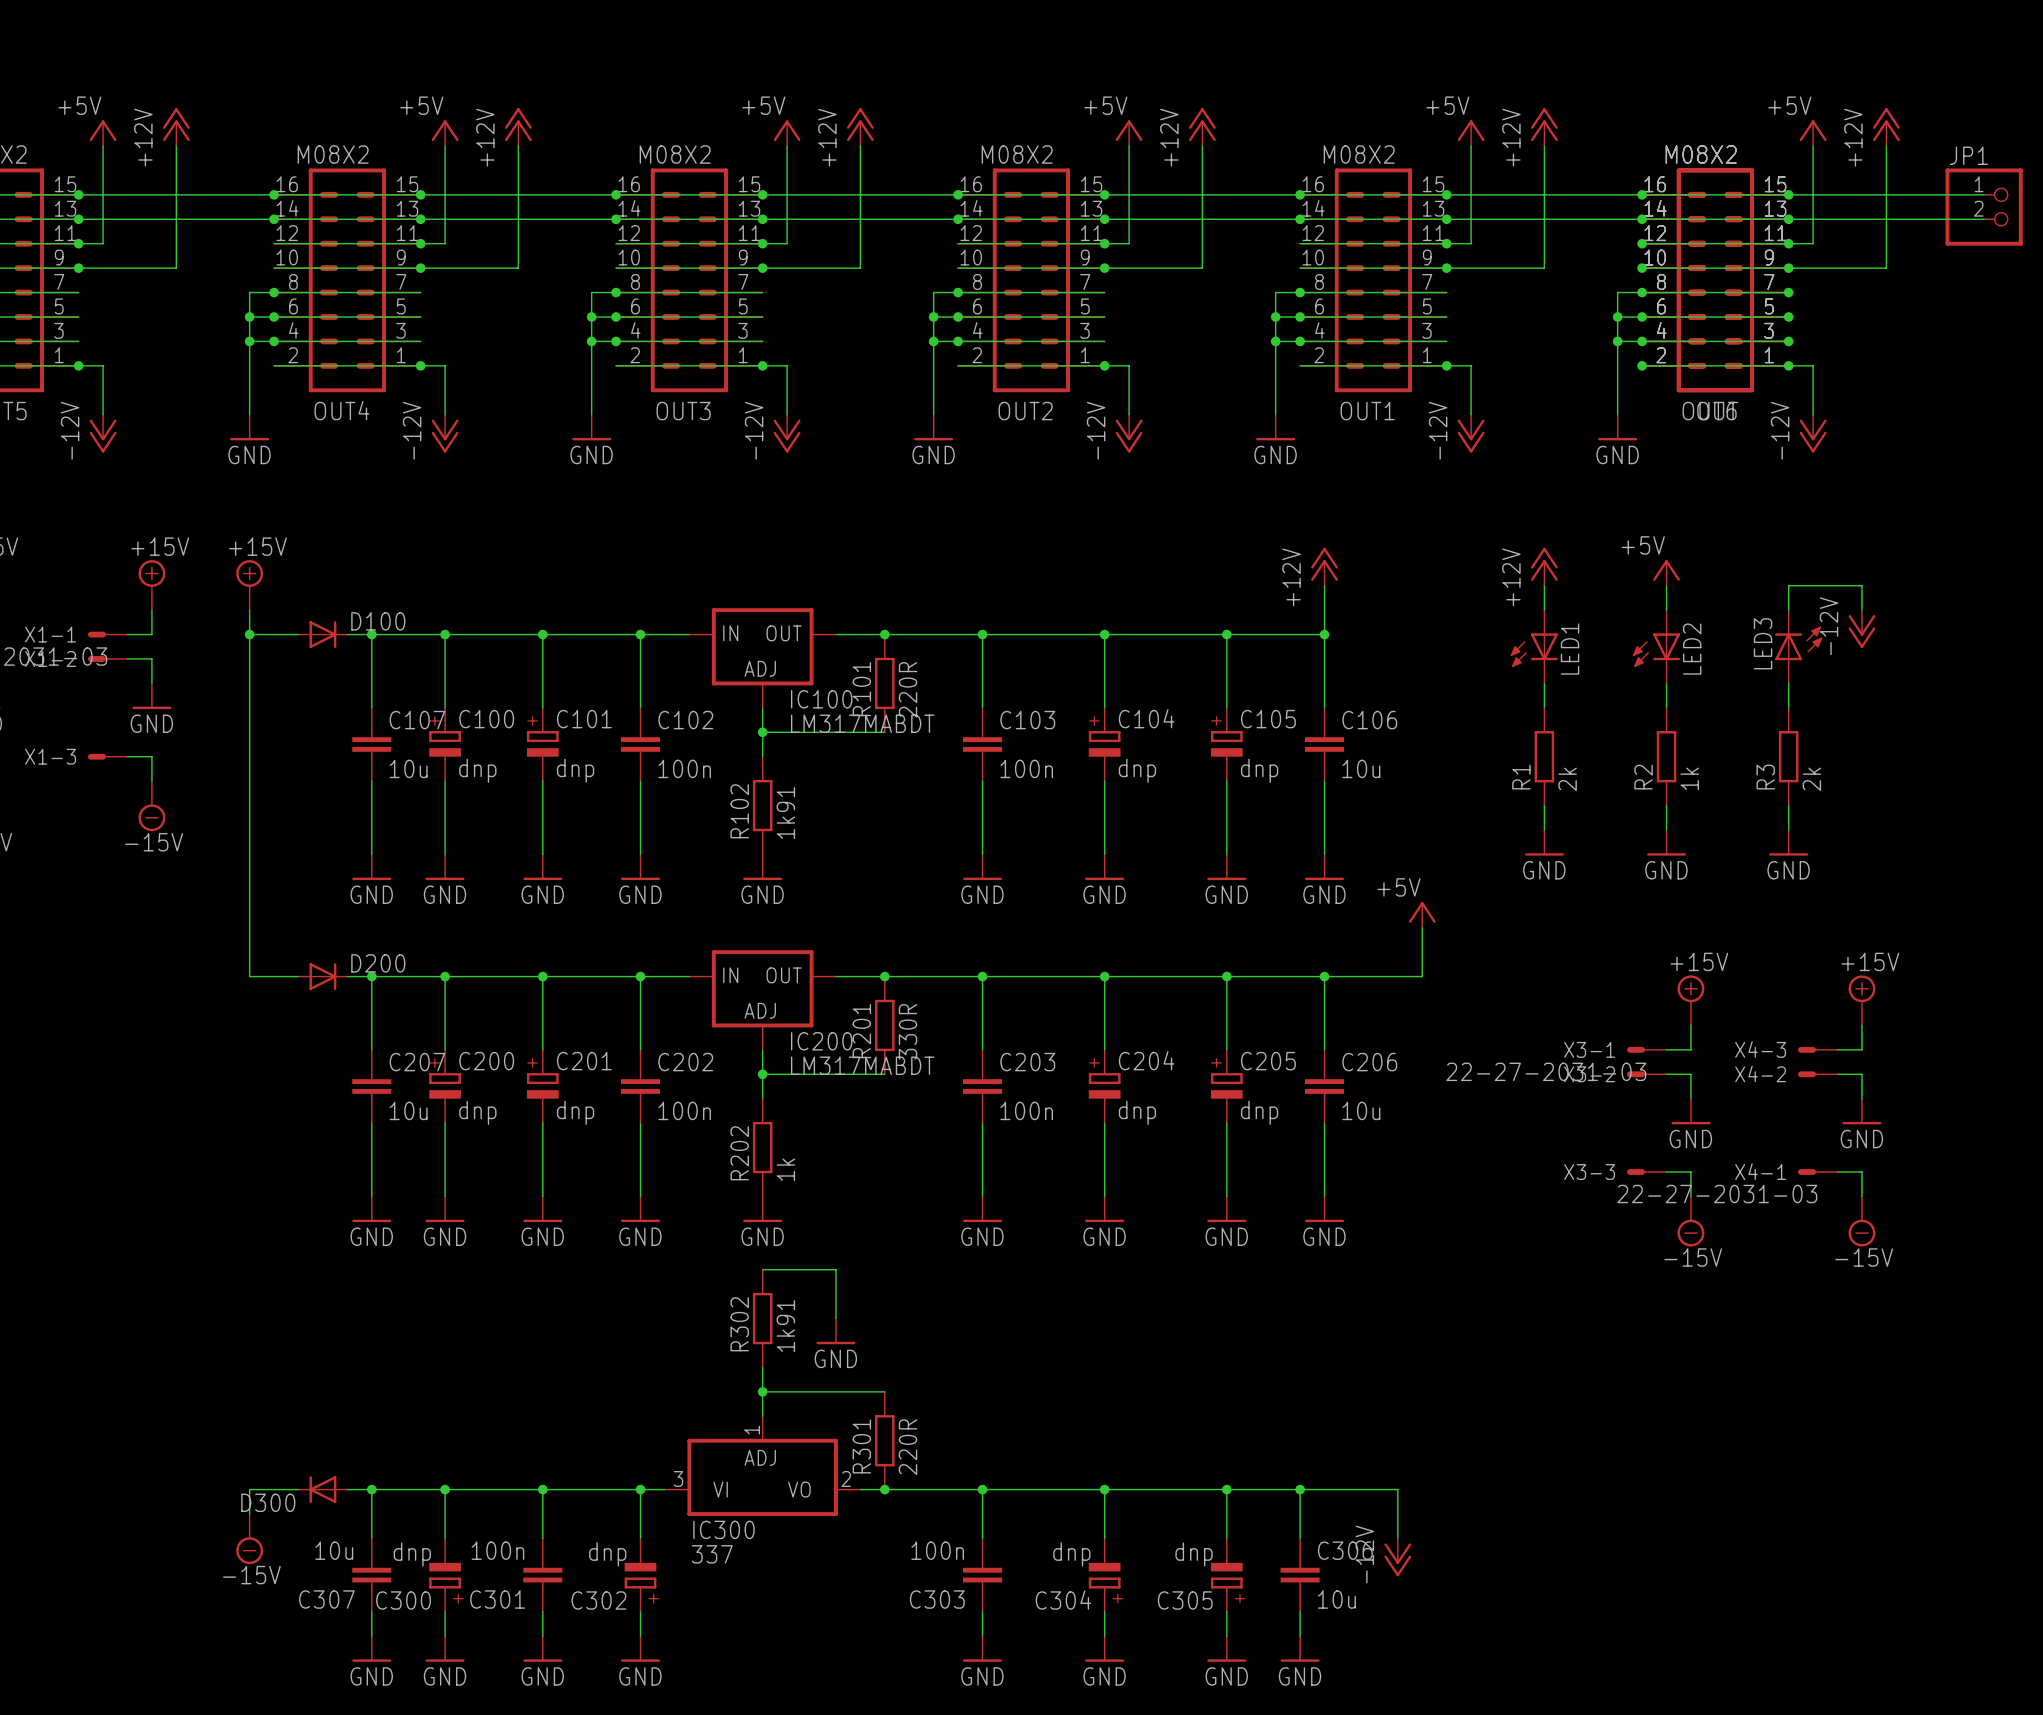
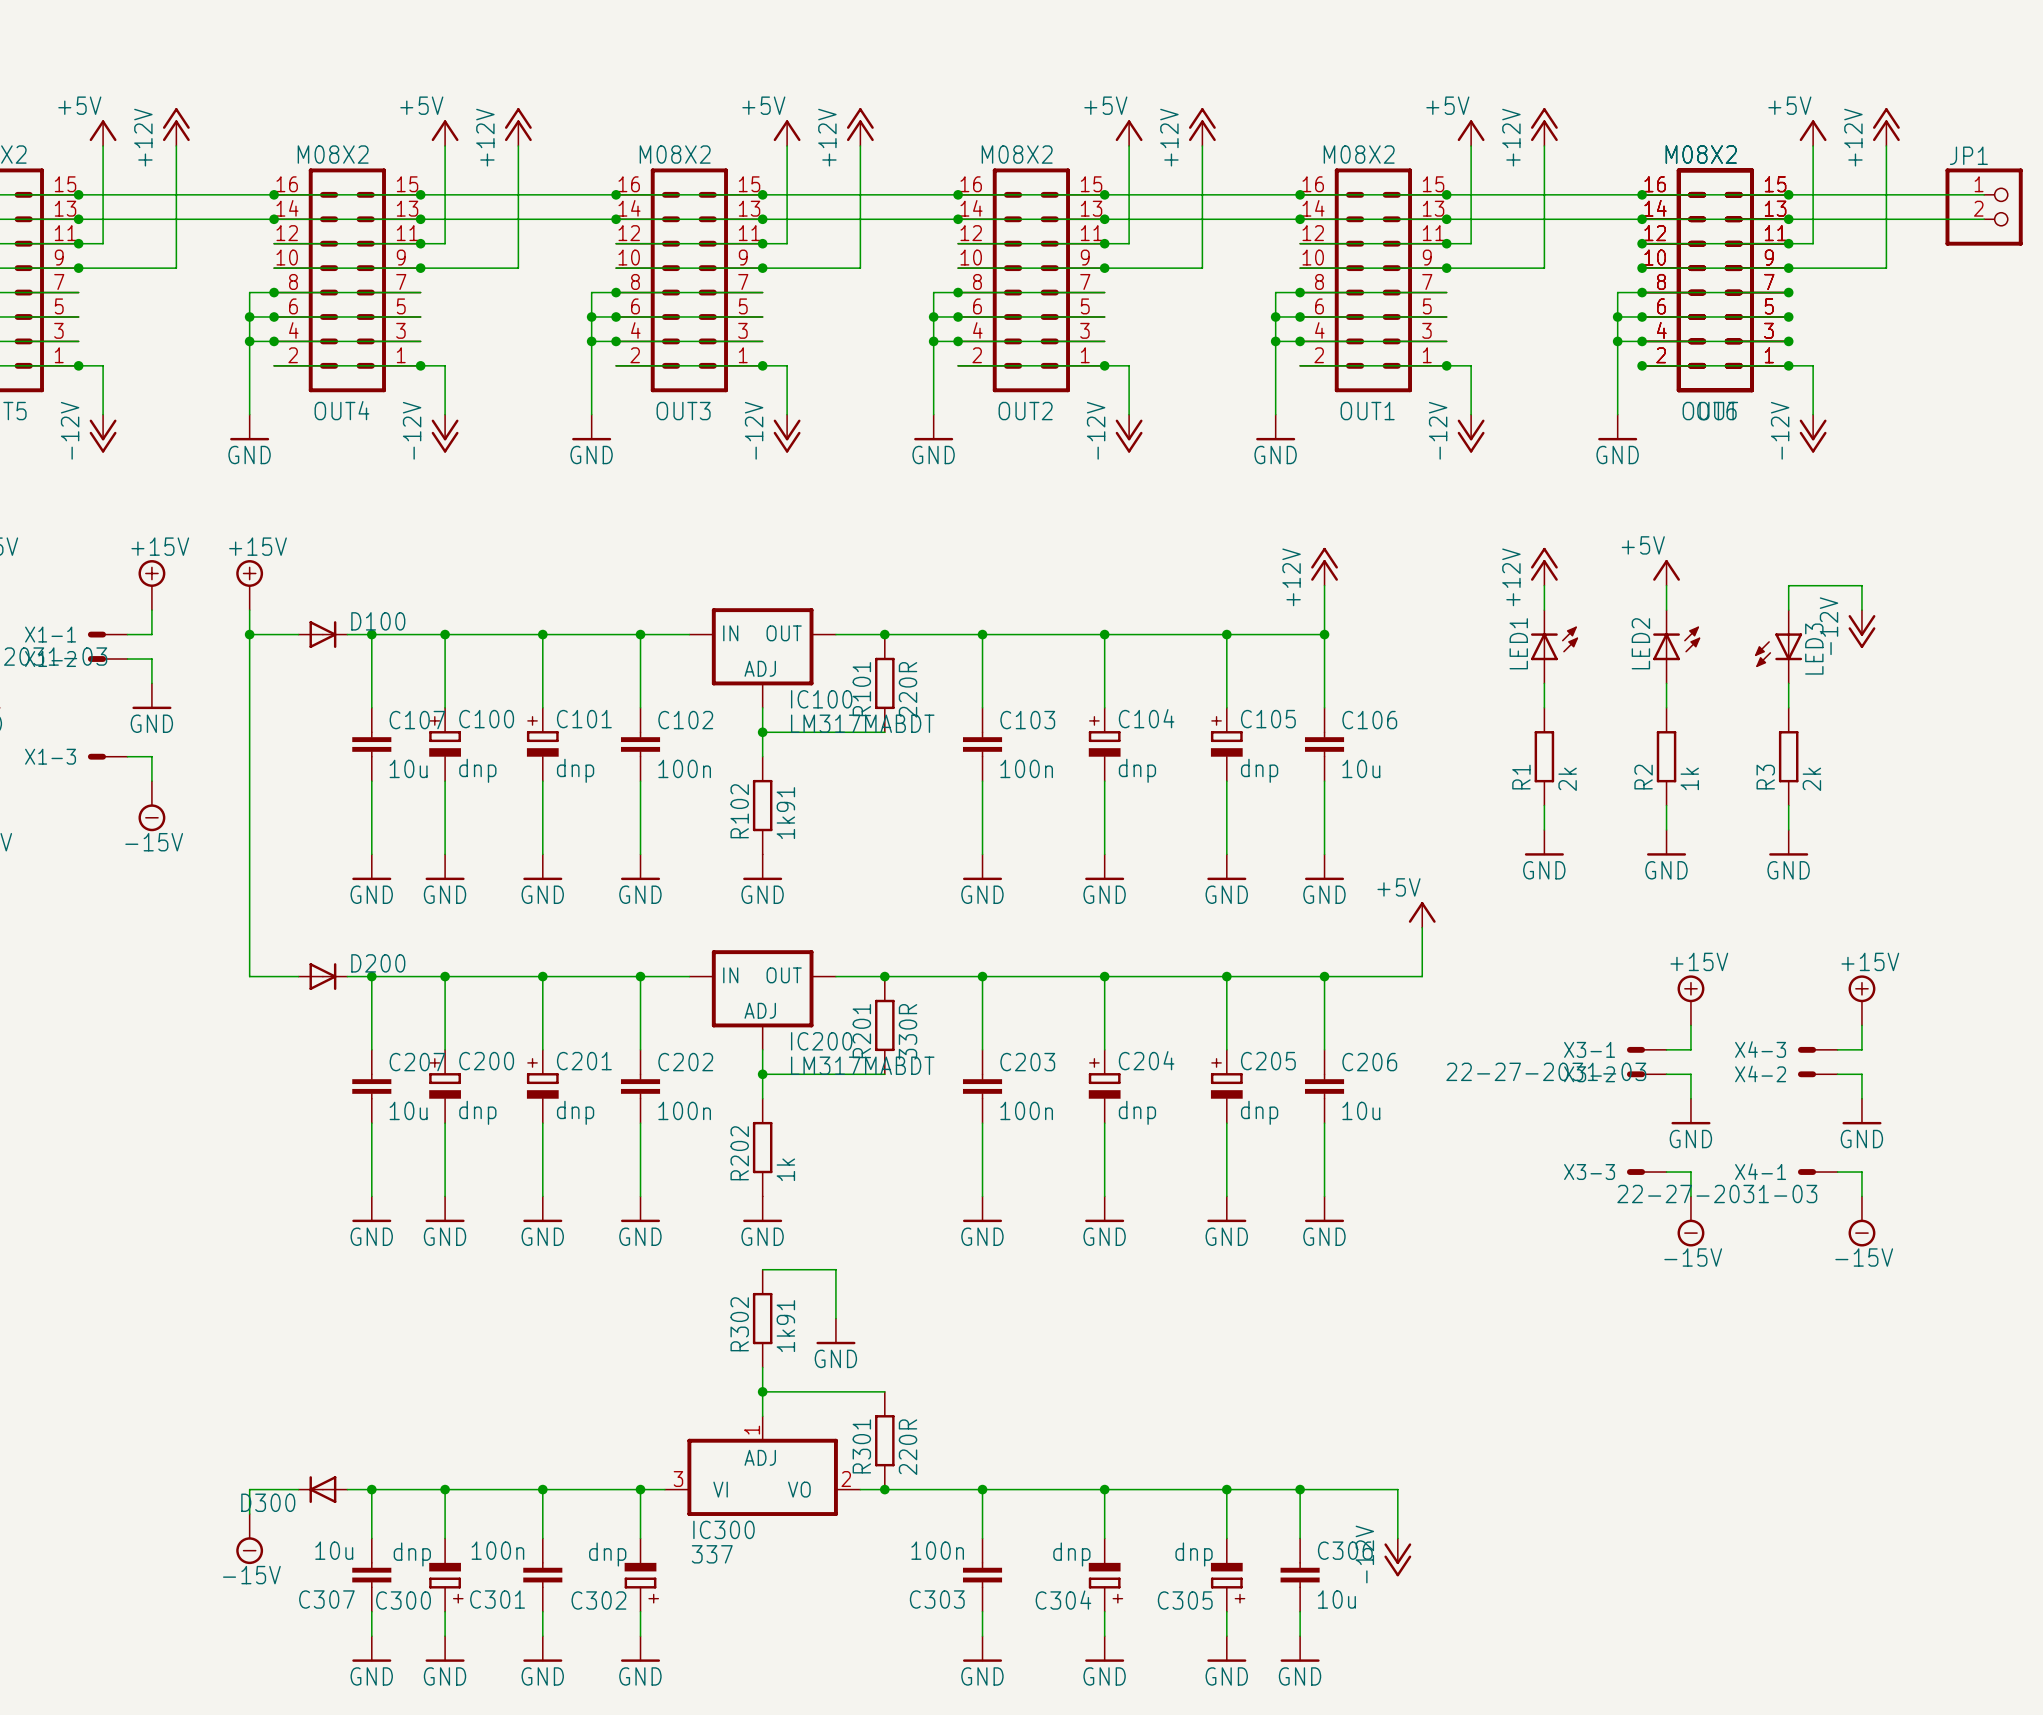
LED3 rotation: 0° (1798, 643) -> 180° (1778, 650)
LED1 rotation: 0° (1534, 650) -> 180° (1554, 643)
LED2 rotation: 0° (1656, 650) -> 180° (1676, 643)

